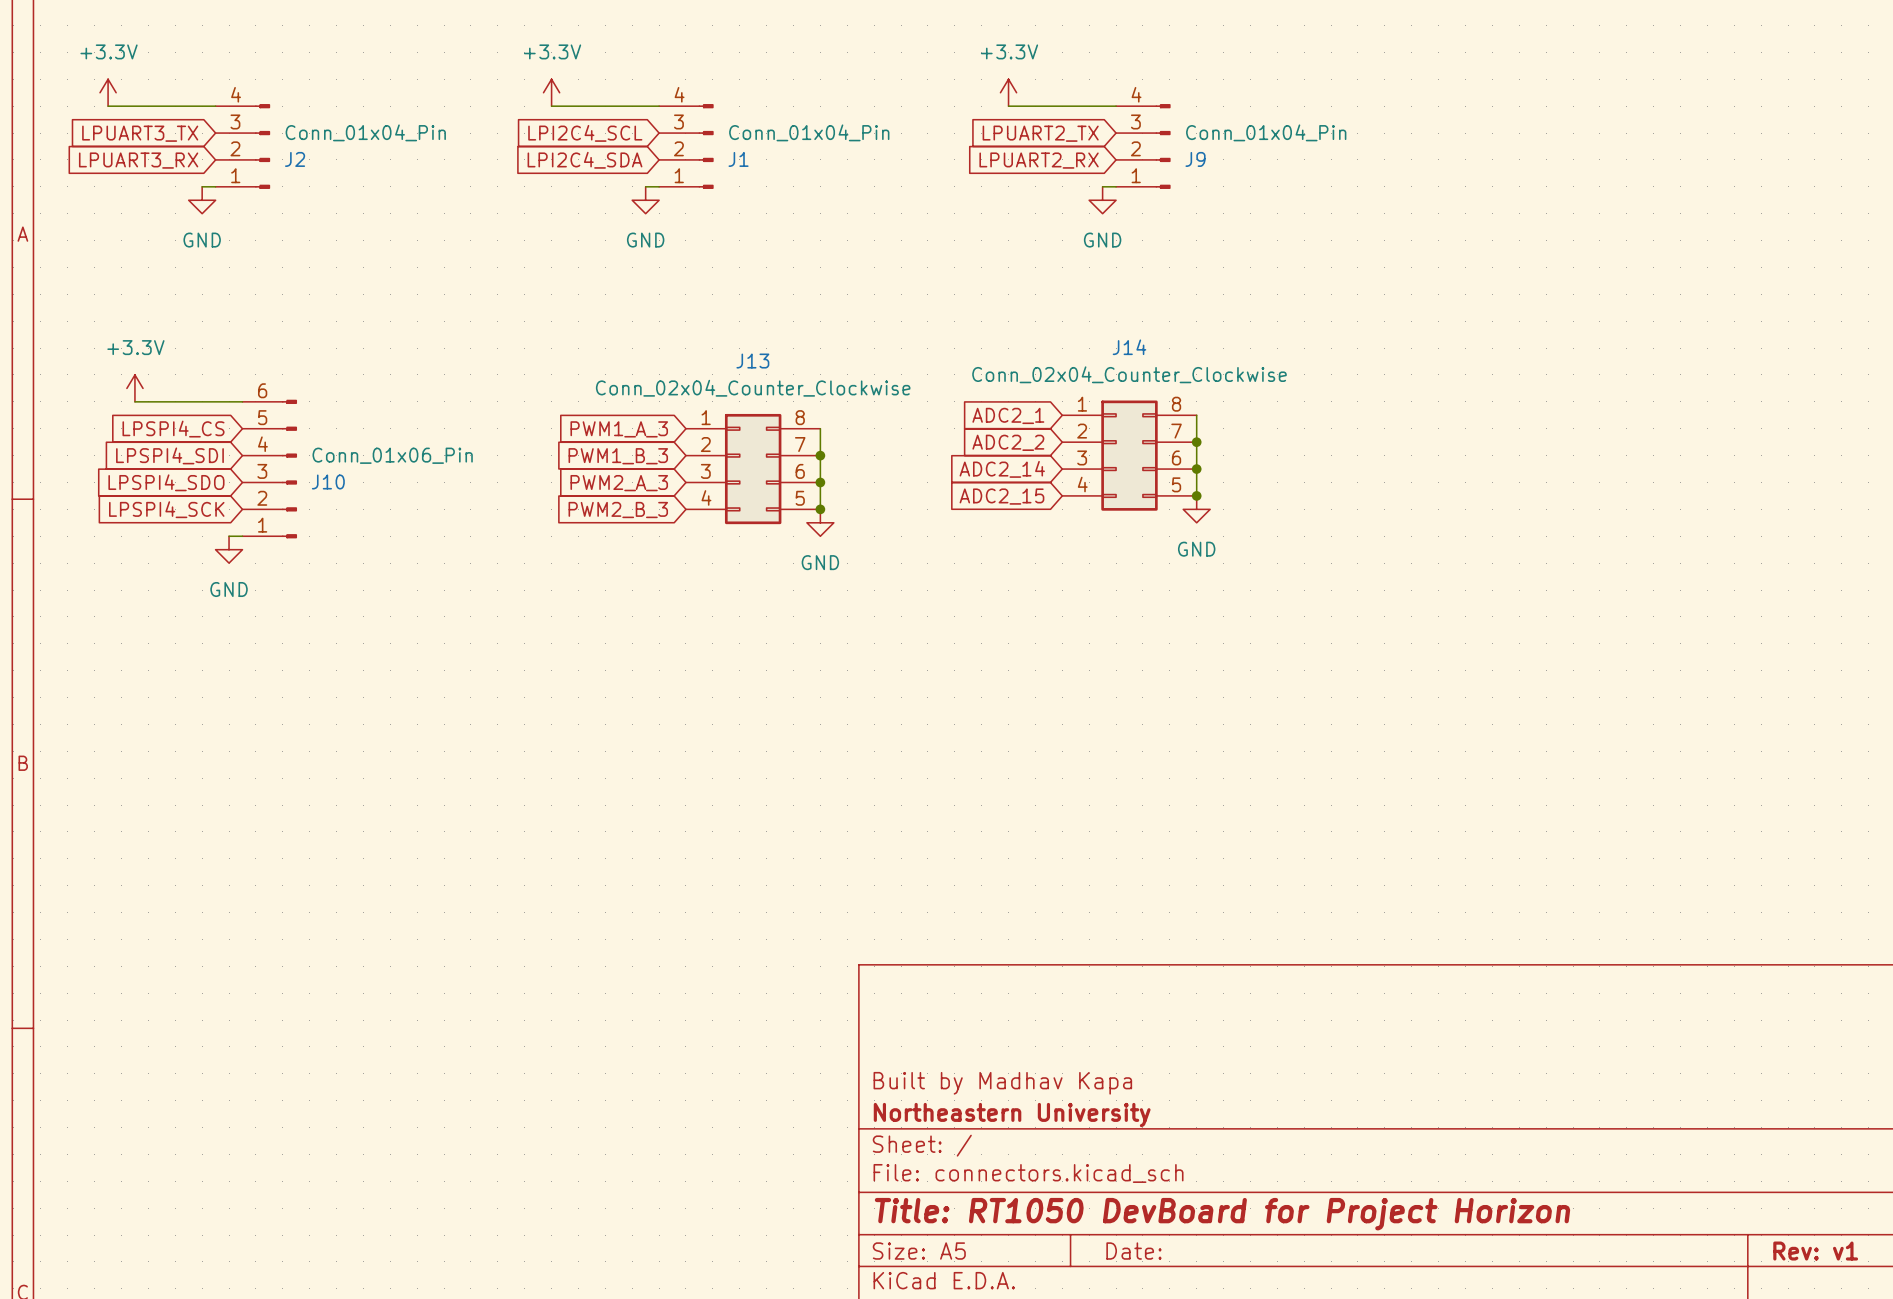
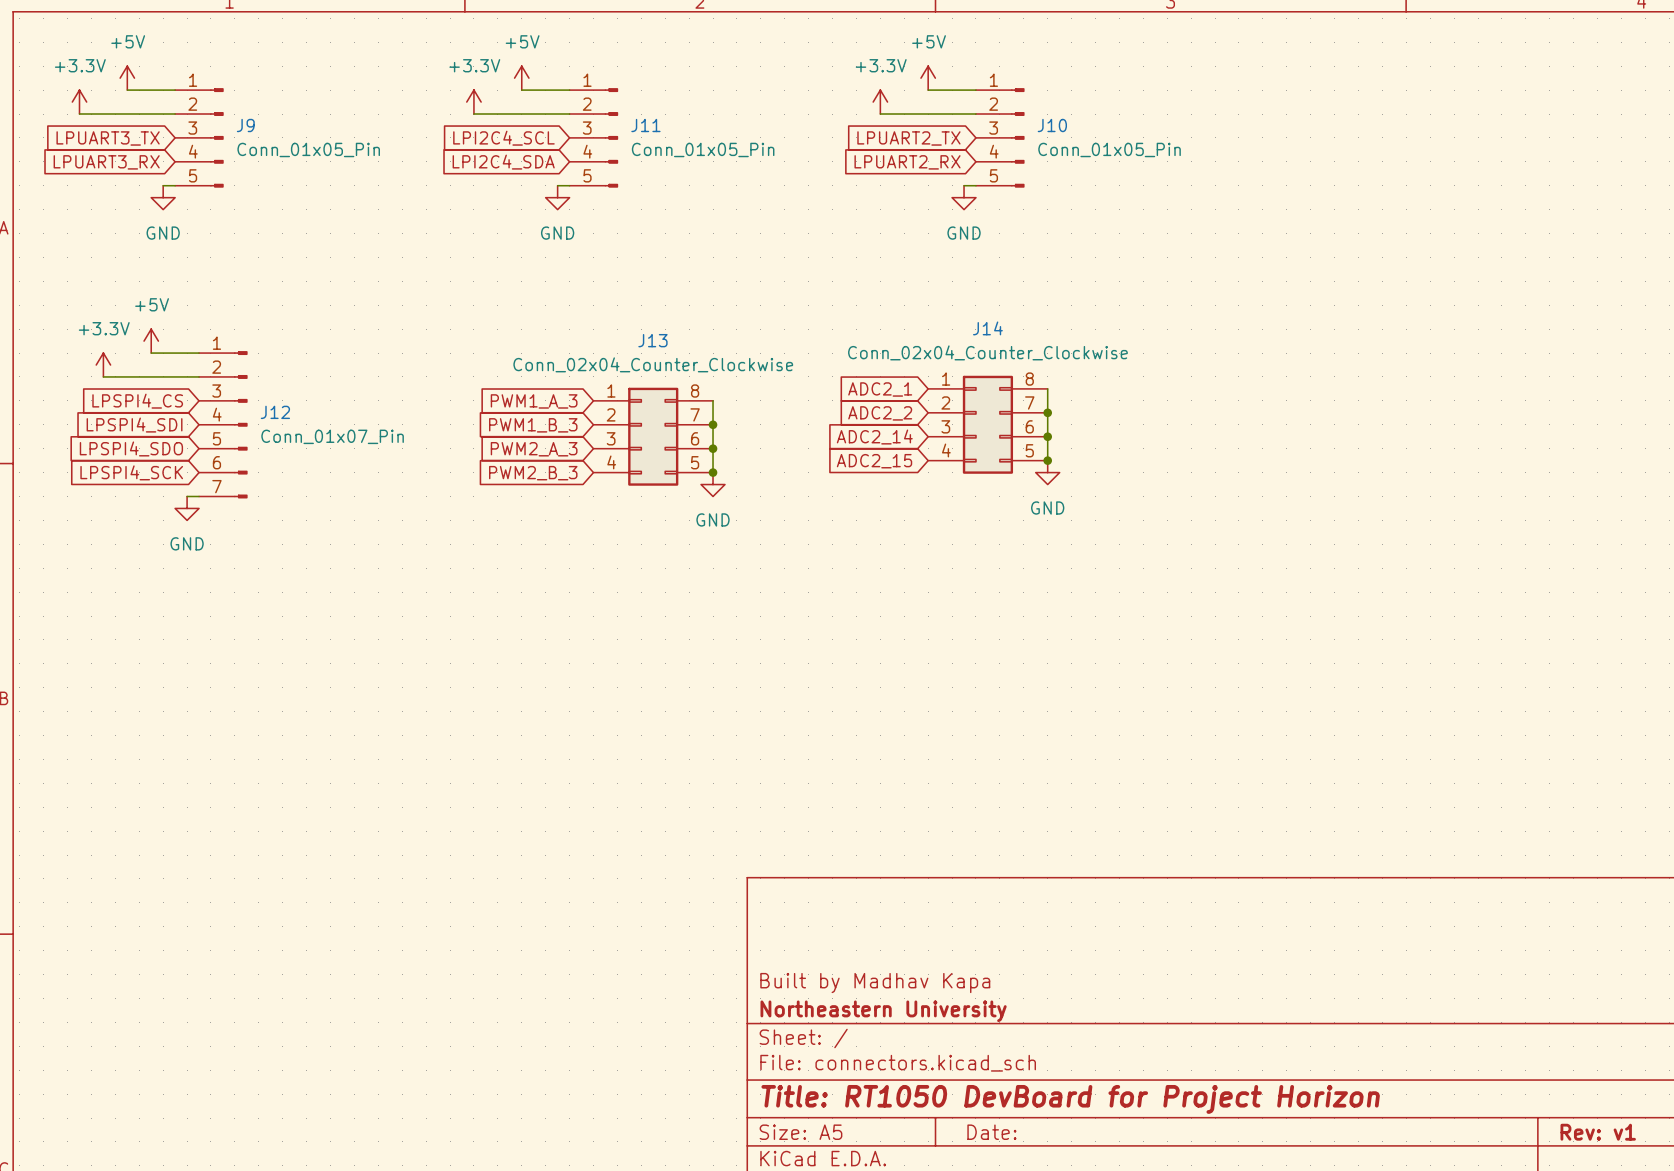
power symbol: none -> +5V (127, 78)
power symbol: none -> +5V (521, 78)
power symbol: none -> +5V (928, 78)
wire: none -> (127, 90) (175, 90)
wire: none -> (521, 90) (569, 90)
wire: none -> (928, 90) (975, 90)
J9 symbol: [1116, 104, 1171, 189] -> [175, 88, 224, 188]
J9 value: Conn_01x04_Pin (1266, 132) -> Conn_01x05_Pin (308, 149)
J11: none -> Conn_01x05_Pin (593, 137)
J2: Conn_01x04_Pin (242, 146) -> none
J1: Conn_01x04_Pin (686, 146) -> none
J9 name position: J9 (1195, 159) -> J9 (245, 125)
power symbol: none -> +5V (151, 341)
wire: none -> (151, 353) (199, 353)
J10 symbol: [242, 399, 298, 539] -> [975, 88, 1025, 188]
J12: none -> Conn_01x07_Pin (223, 424)
J10 value: Conn_01x06_Pin (392, 455) -> Conn_01x05_Pin (1109, 149)
J10 name position: J10 (328, 481) -> J10 (1052, 125)

